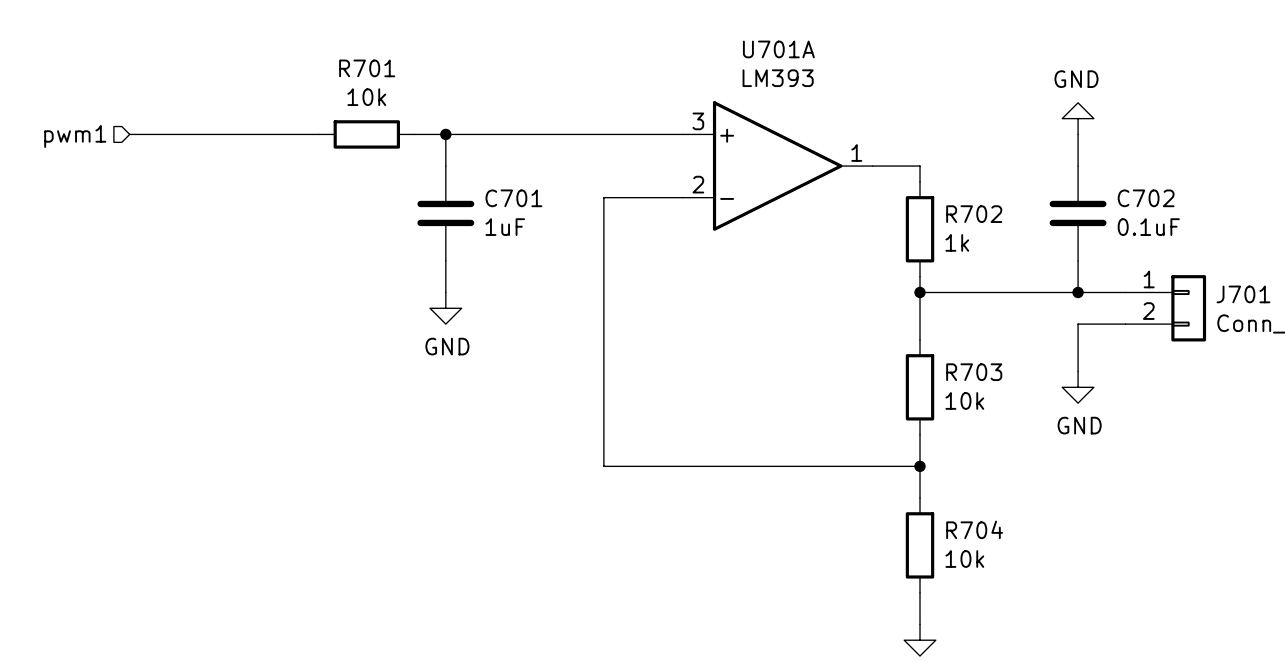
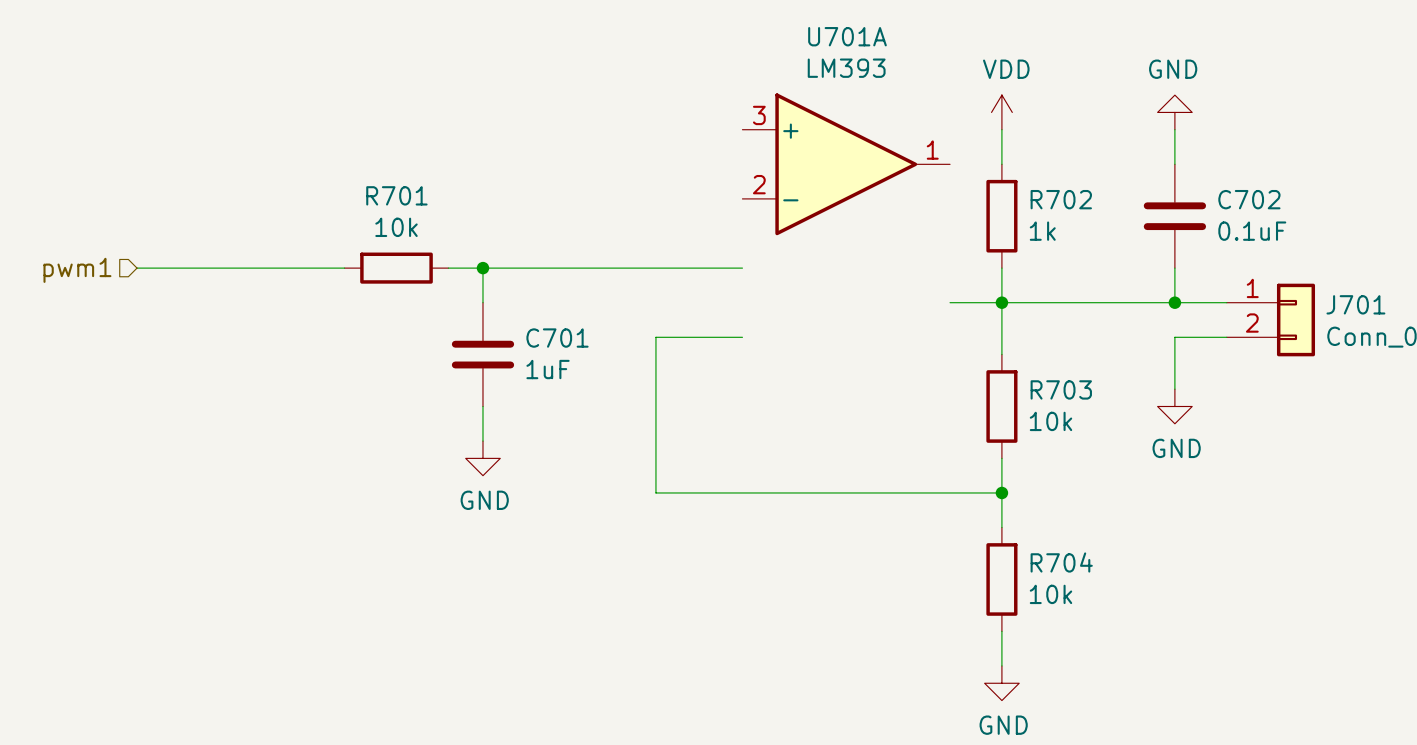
power symbol: none -> VDD (1001, 112)
wire: (129, 134) (319, 134) -> (137, 268) (344, 268)
R701 position: (366, 134) -> (396, 268)
wire: (414, 134) (682, 134) -> (448, 268) (742, 268)
wire: (445, 134) (445, 166) -> (482, 406) (482, 441)
junction: (445, 134) -> none
wire: none -> (1001, 129) (1001, 164)
hierarchical label position: pwm1 (75, 136) -> pwm1 (77, 270)
wire: (872, 166) (920, 166) (920, 181) -> none
wire: (682, 197) (603, 197) (603, 324) -> (742, 337) (655, 337)
C701 position: (445, 213) -> (482, 354)
R702 position: (920, 229) -> (1001, 216)
junction: none -> (482, 268)
wire: none -> (950, 302) (1001, 302)
power symbol position: GND (445, 308) -> GND (482, 458)

